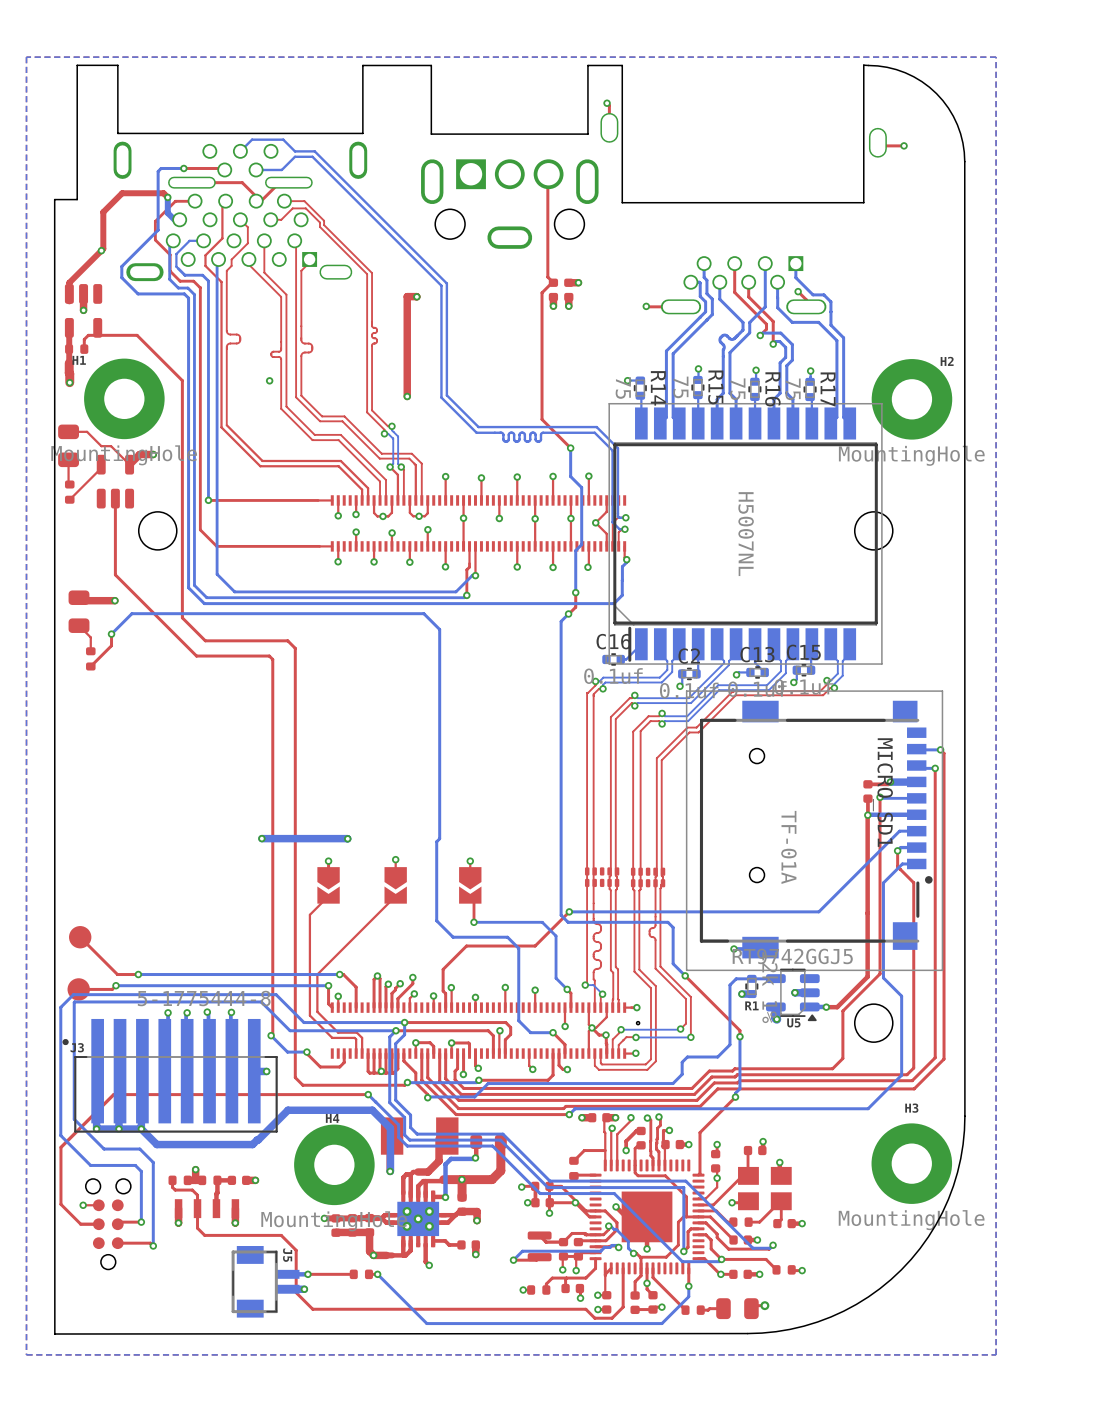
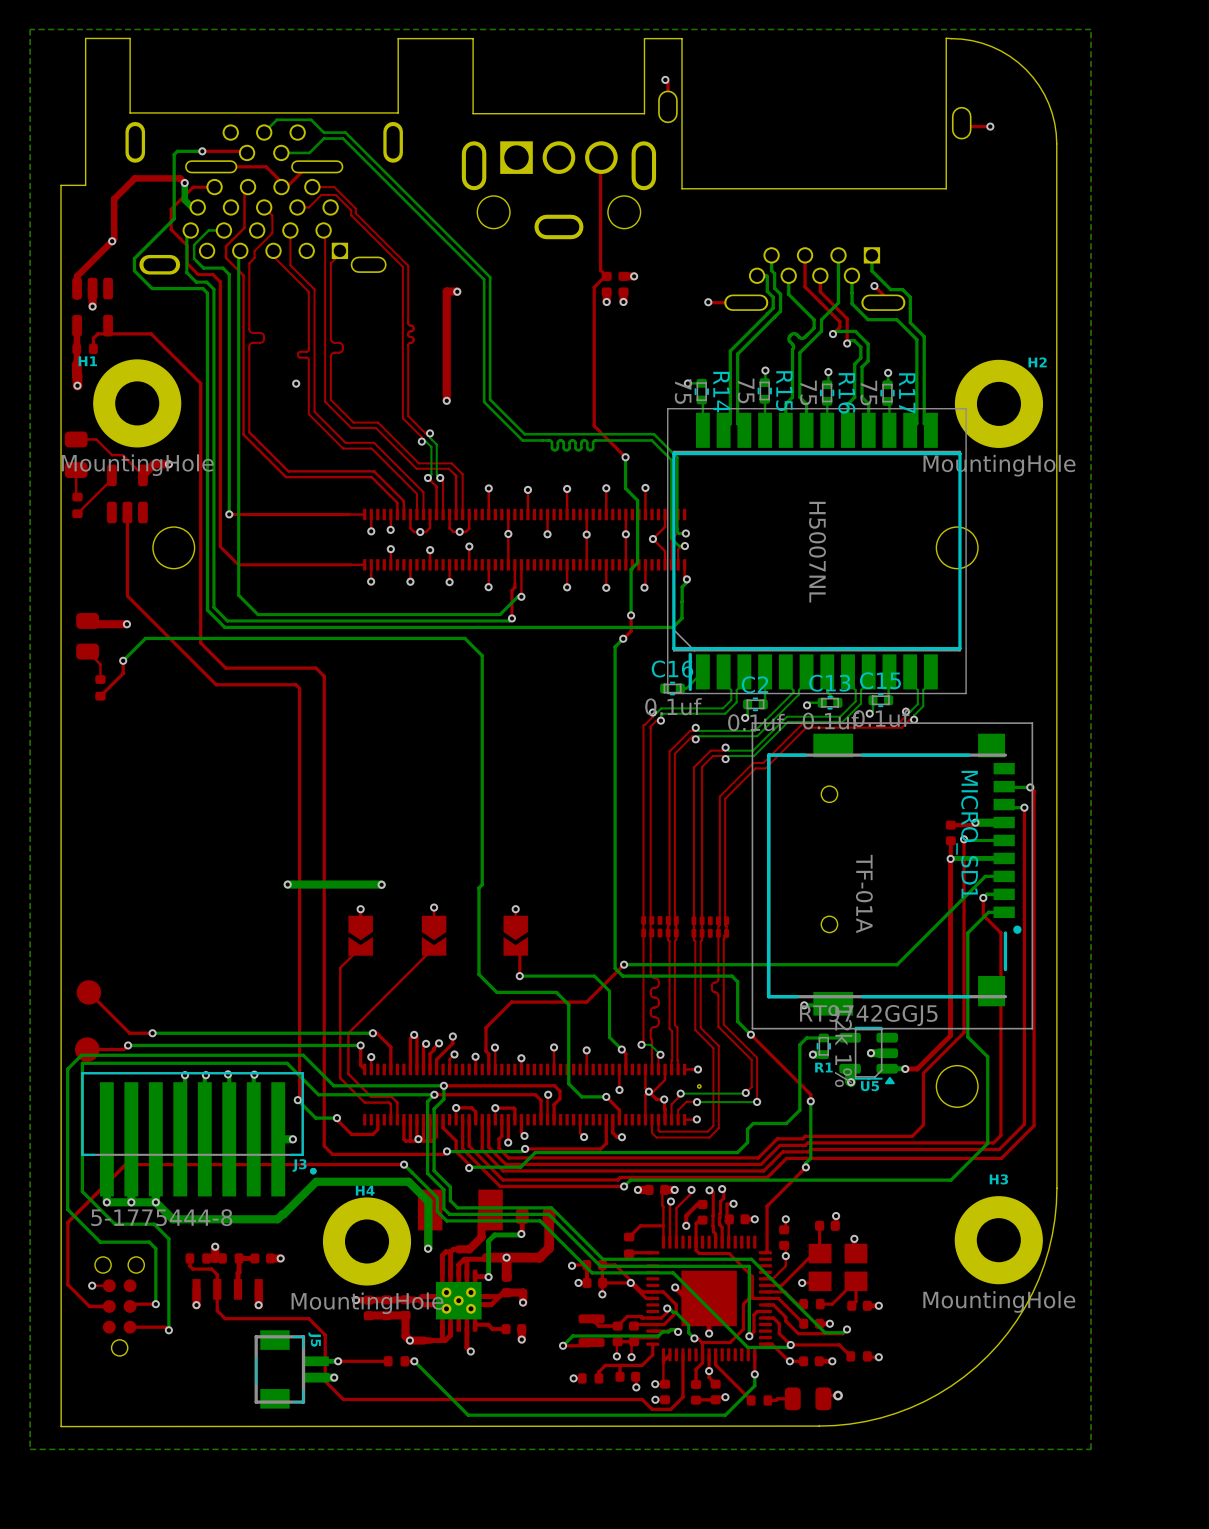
J3 rotation: 0° (170, 1075) -> 180° (198, 1134)

